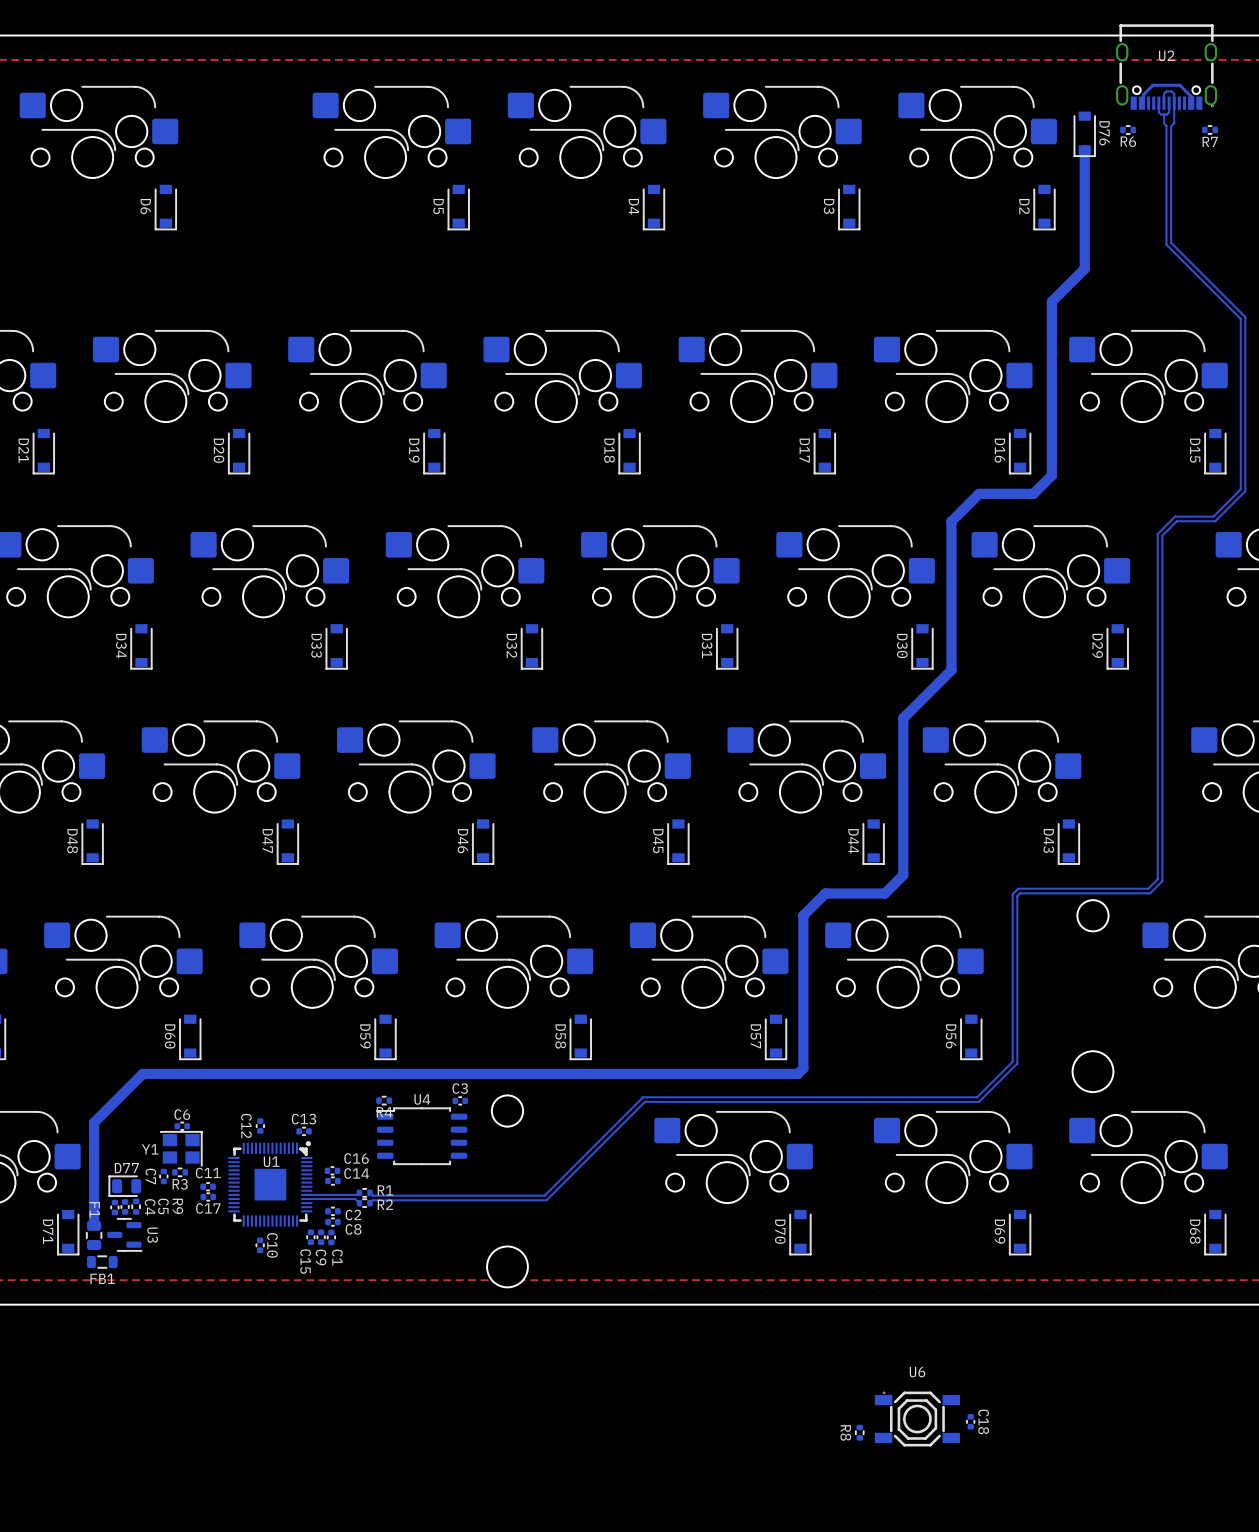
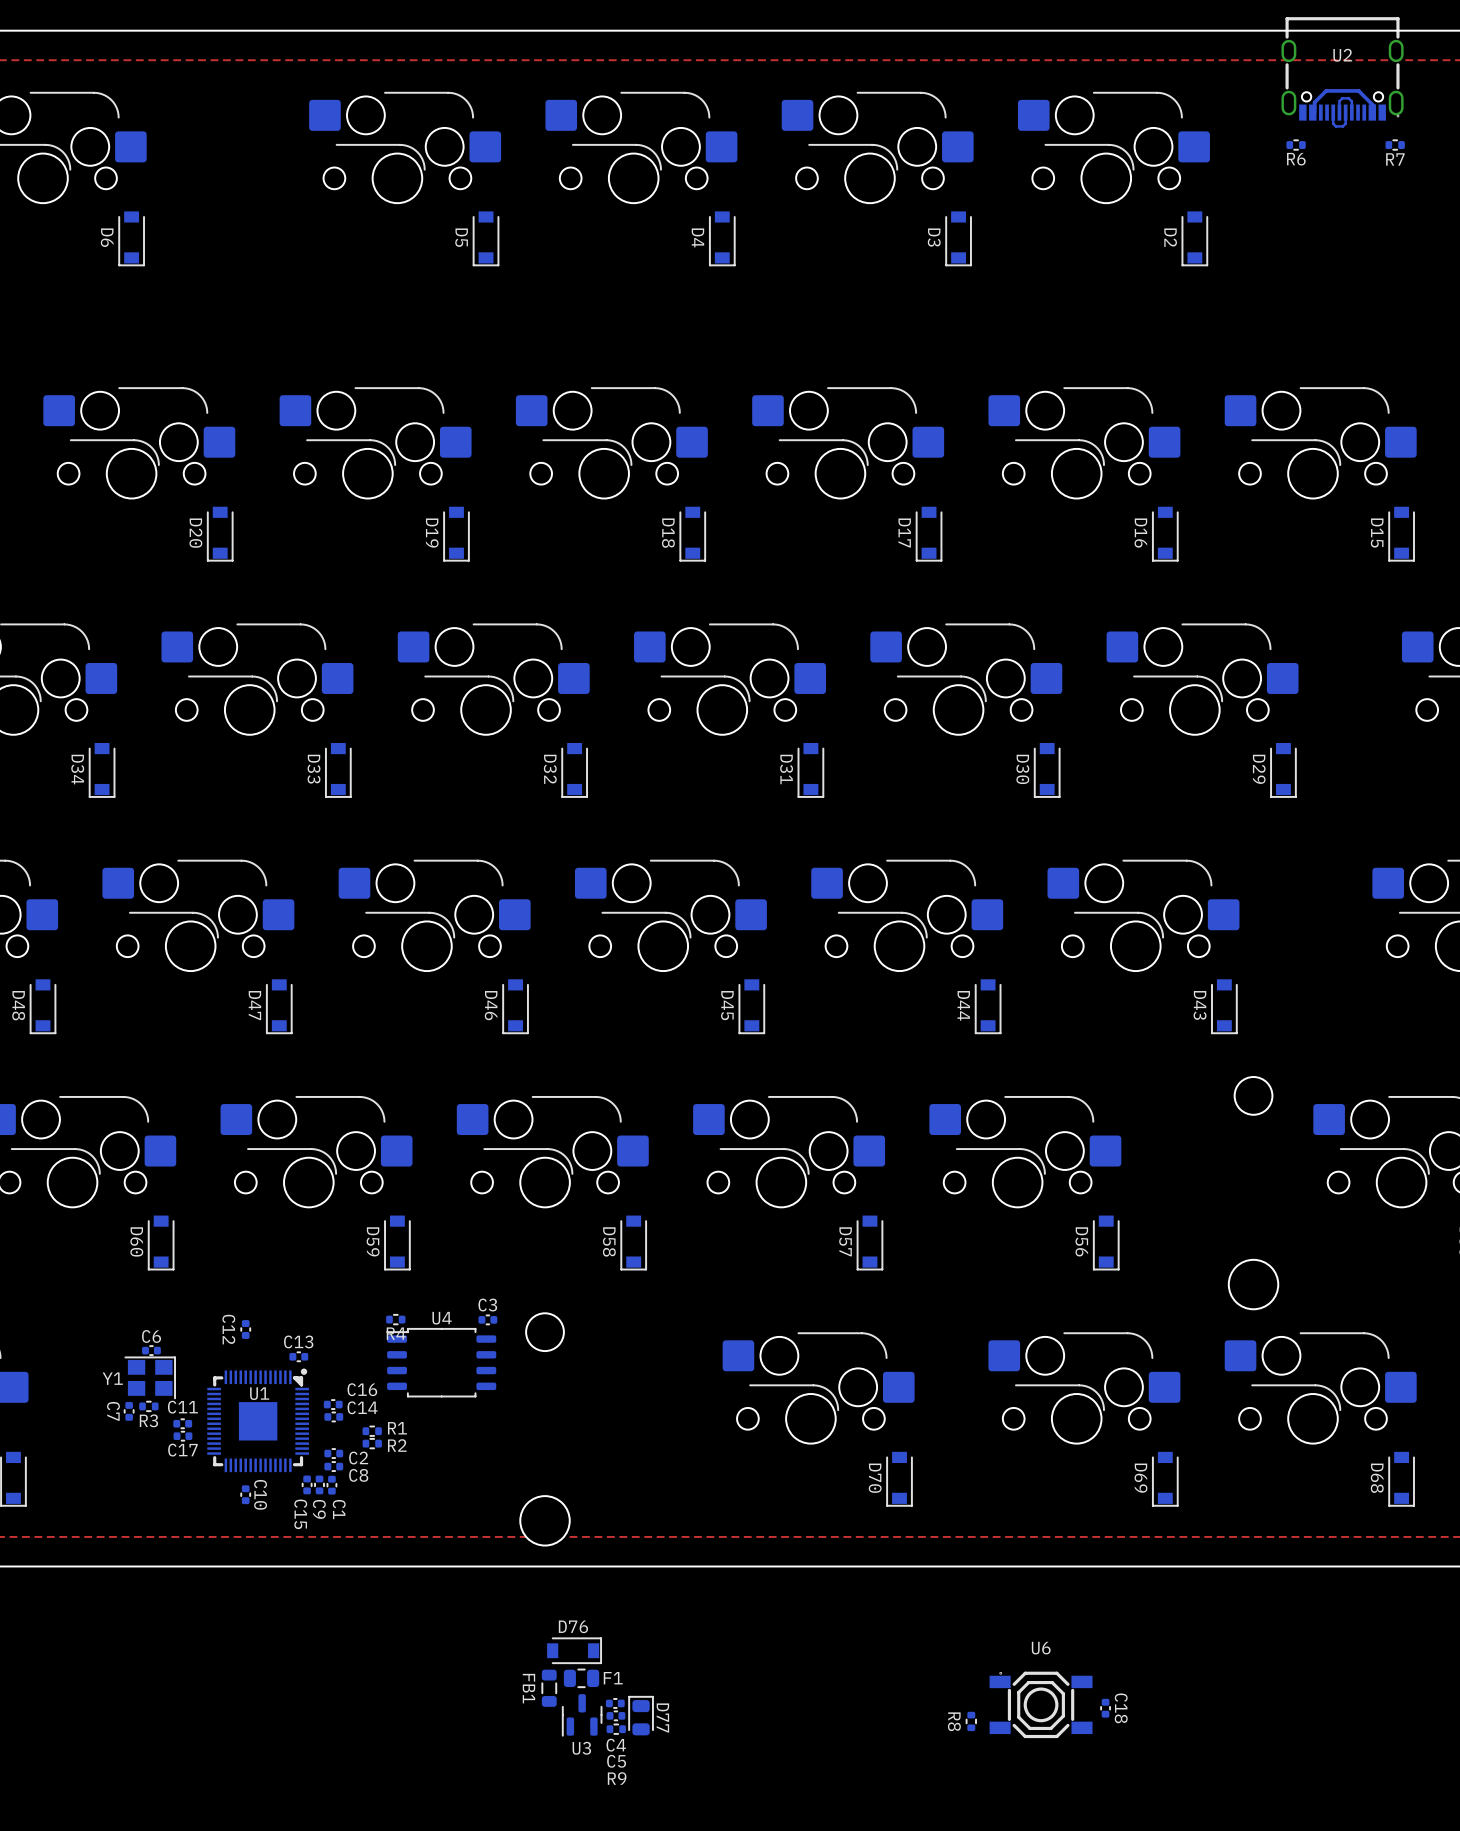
bottom track: (1174, 103) (1174, 123) (1171, 126) (1171, 242) (1245, 317) (1245, 491) (1215, 521) (1176, 521) (1162, 535) (1162, 881) (1150, 893) (1020, 893) (1017, 896) (1017, 1063) (979, 1101) (644, 1101) (546, 1200) (372, 1200) (369, 1203) -> none
bottom track: (1164, 114) (1164, 123) (1166, 125) (1166, 244) (1240, 319) (1240, 489) (1213, 516) (1174, 516) (1157, 533) (1157, 879) (1148, 888) (1018, 888) (1012, 894) (1012, 1061) (977, 1097) (643, 1097) (544, 1195) (372, 1195) (369, 1192) -> none
D76 rotation: 0° (1084, 134) -> 90° counterclockwise (574, 1650)
D76 position: (1084, 134) -> (574, 1650)
bottom track: (1084, 149) (1084, 268) (1051, 301) (1051, 475) (1033, 493) (979, 493) (951, 521) (951, 670) (903, 718) (903, 875) (884, 893) (825, 893) (803, 915) (803, 1068) (797, 1073) (142, 1073) (94, 1122) (94, 1225) -> none
C12 position: (260, 1126) -> (245, 1329)
D77 rotation: 0° (125, 1186) -> 90° clockwise (641, 1715)
D77 position: (125, 1186) -> (641, 1715)
bottom track: (359, 1192) (357, 1194) (306, 1194) -> none
bottom track: (306, 1199) (355, 1199) (359, 1203) -> none
C5 rotation: 0° (125, 1206) -> 90° clockwise (615, 1715)
C5 position: (125, 1206) -> (615, 1715)
R9 rotation: 0° (136, 1206) -> 90° clockwise (616, 1729)
R9 position: (136, 1206) -> (616, 1729)
C4 rotation: 0° (114, 1207) -> 90° clockwise (615, 1703)
C4 position: (114, 1207) -> (615, 1703)
U3 rotation: 0° (124, 1234) -> 90° clockwise (582, 1715)
U3 position: (124, 1234) -> (582, 1715)
F1 rotation: 0° (94, 1235) -> 90° clockwise (581, 1678)
F1 position: (94, 1235) -> (581, 1678)
FB1 rotation: 0° (102, 1262) -> 90° clockwise (549, 1688)
FB1 position: (102, 1262) -> (549, 1688)

